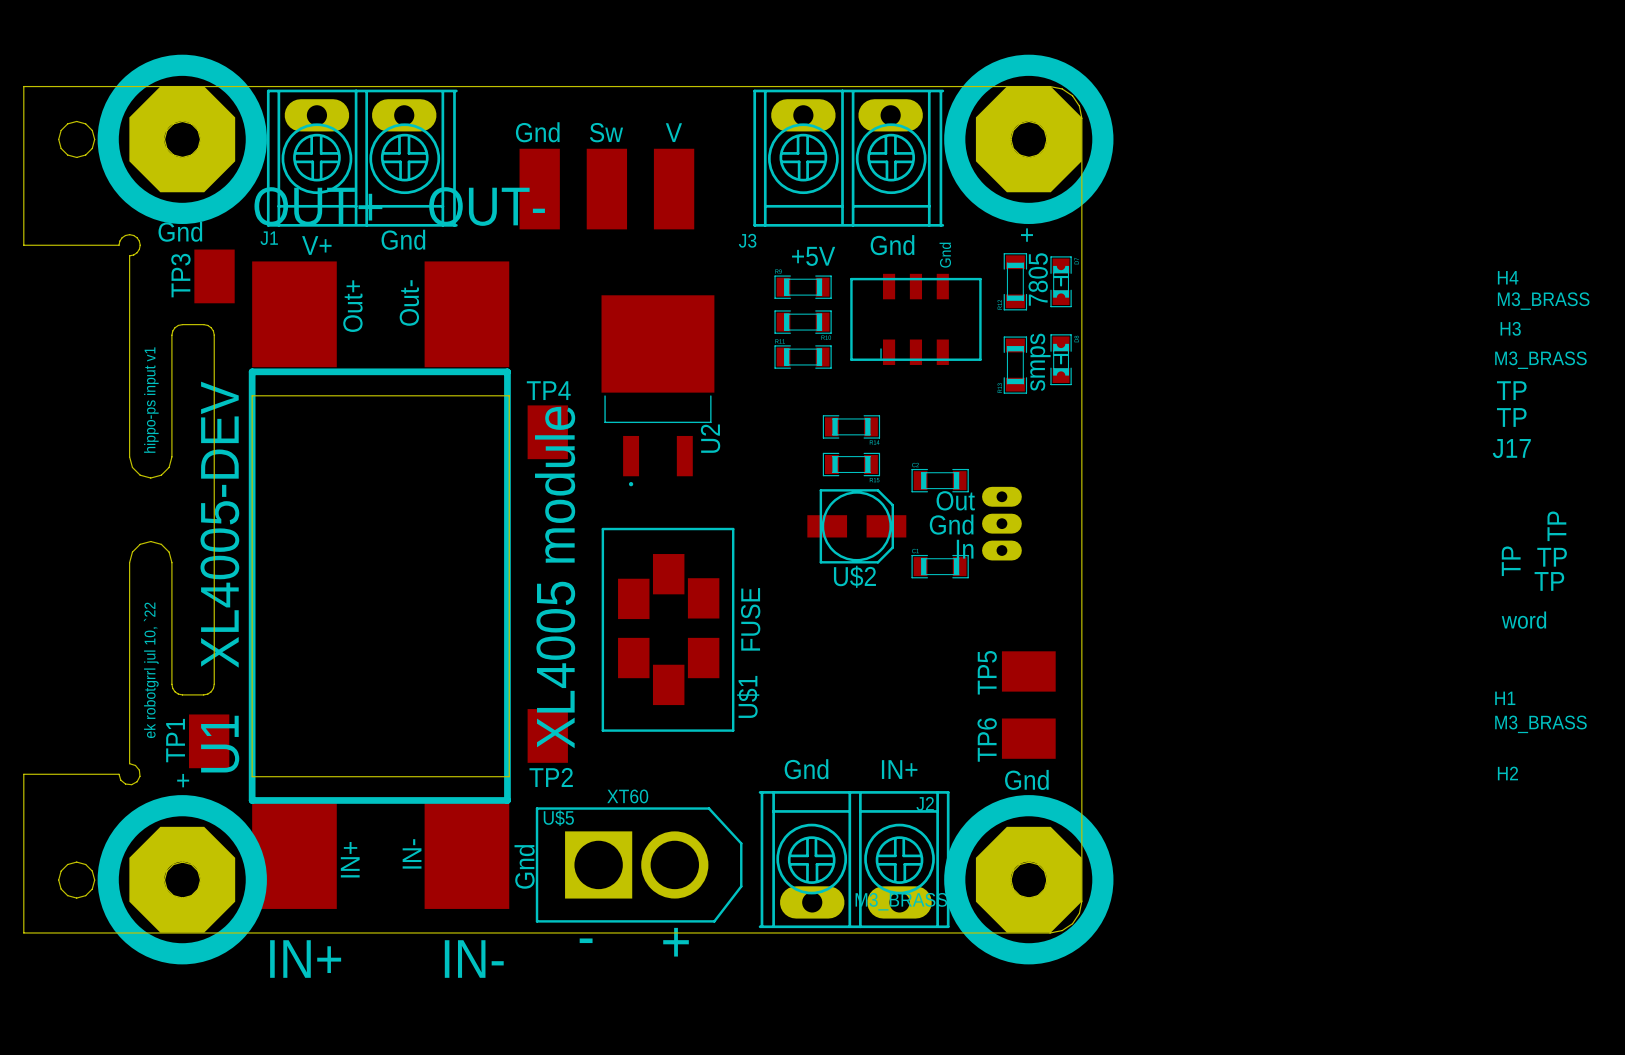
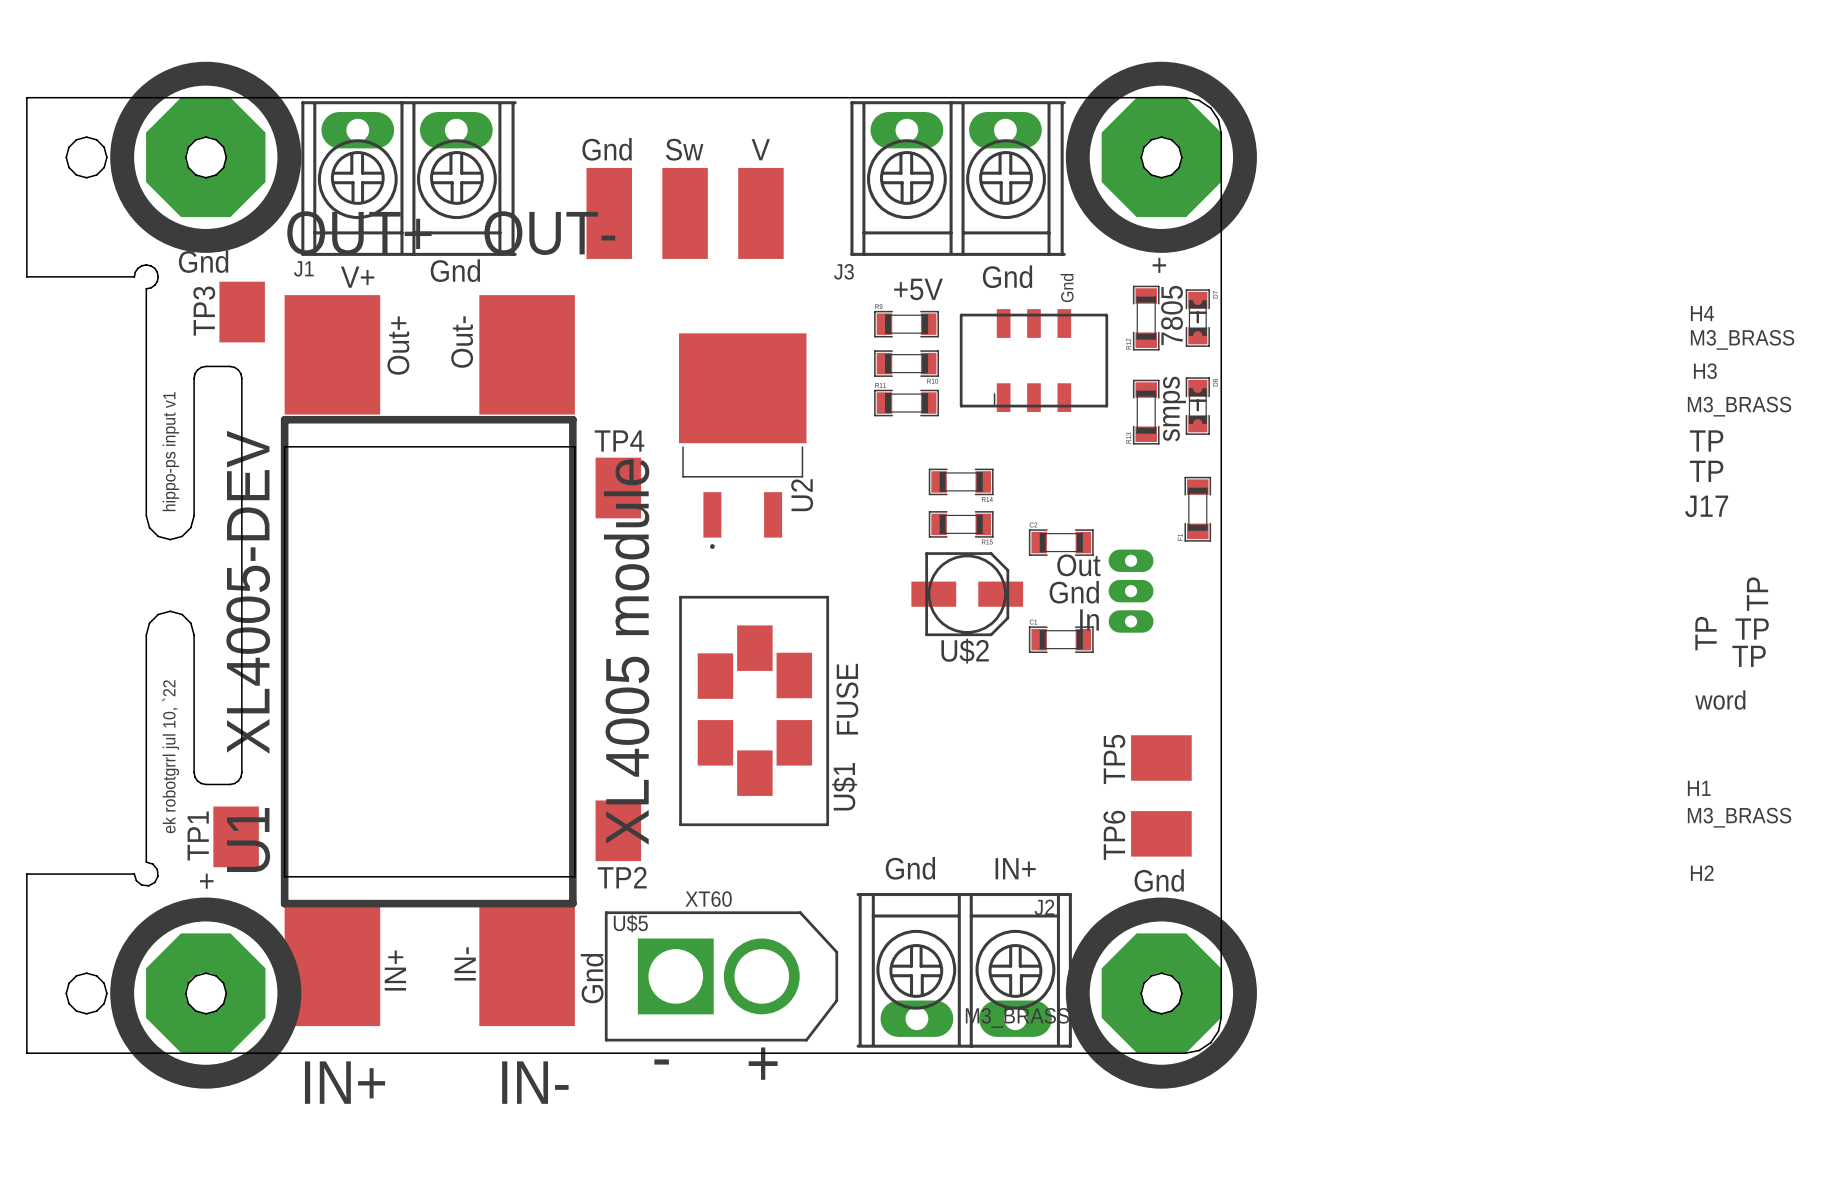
part: none -> (1197, 509)

